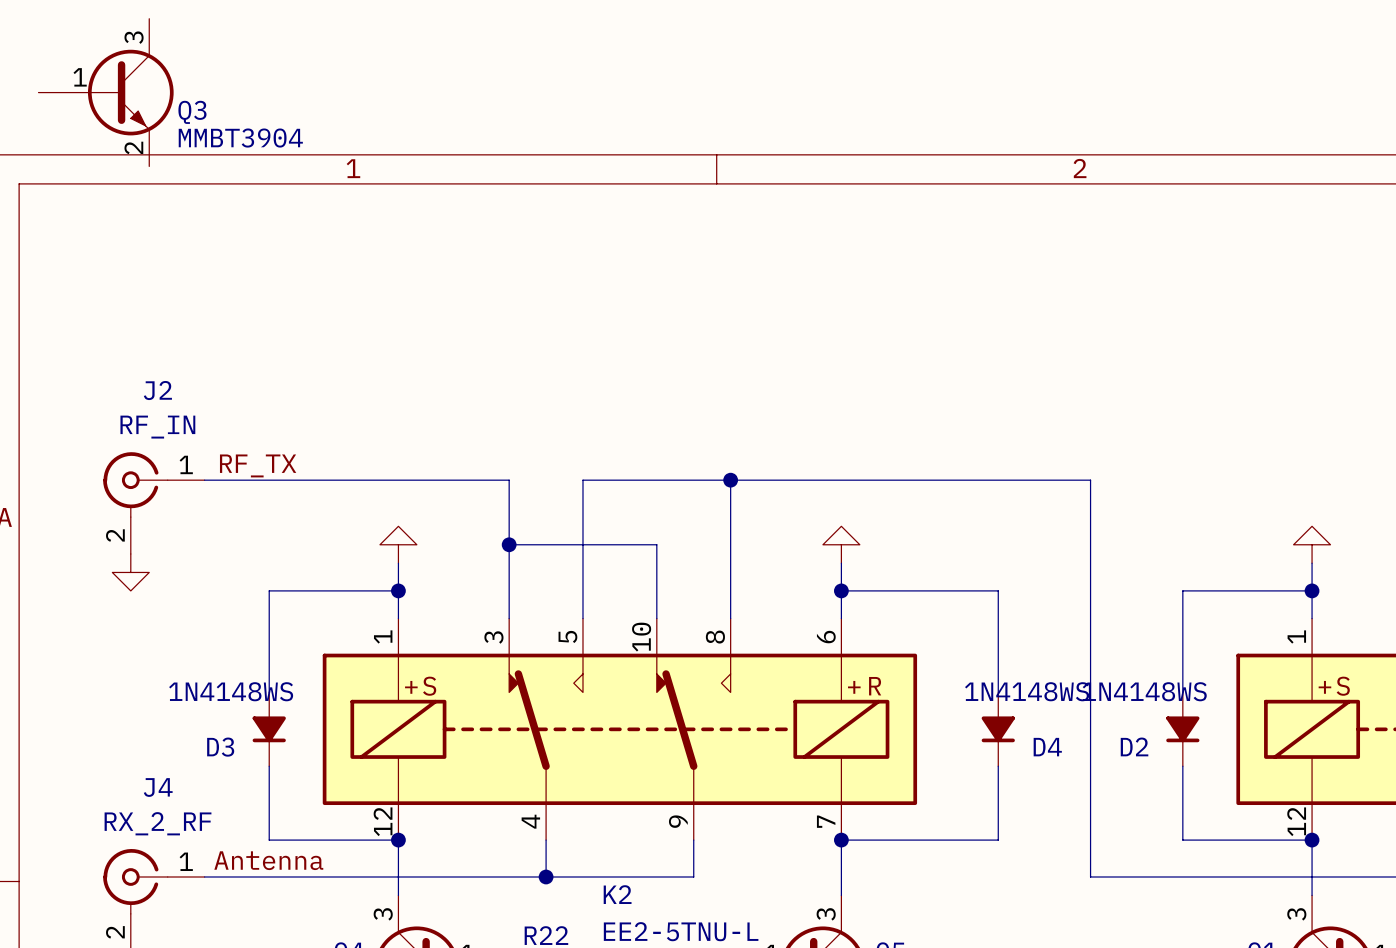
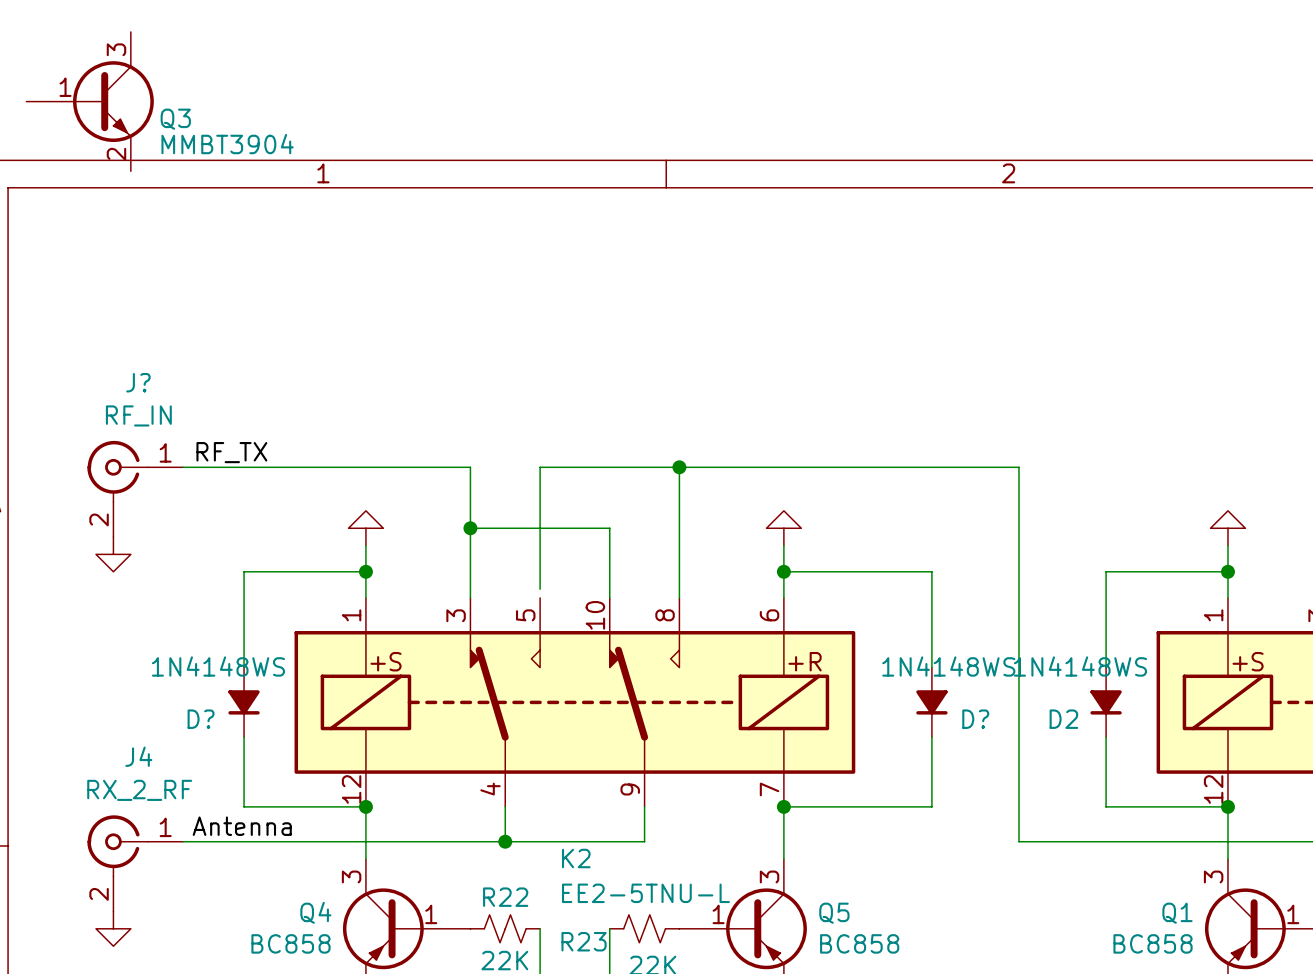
J2 name: J2 (157, 390) -> J? (138, 382)
wire: (582, 609) (582, 618) -> none
D3 name: D3 (220, 747) -> D? (201, 719)
D4 name: D4 (1047, 747) -> D? (975, 719)

